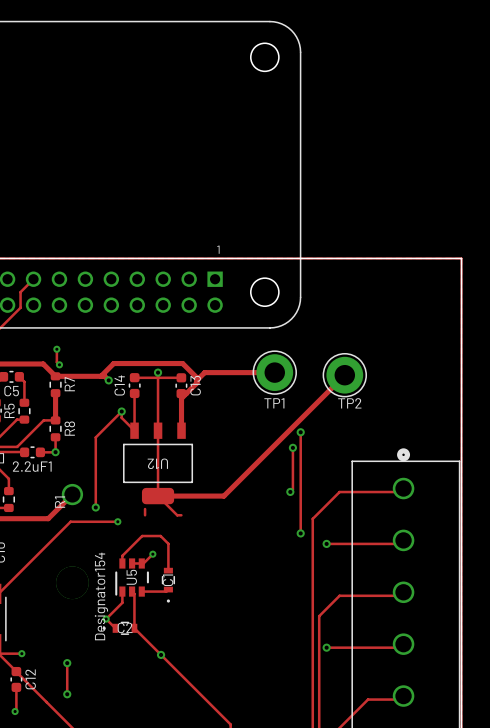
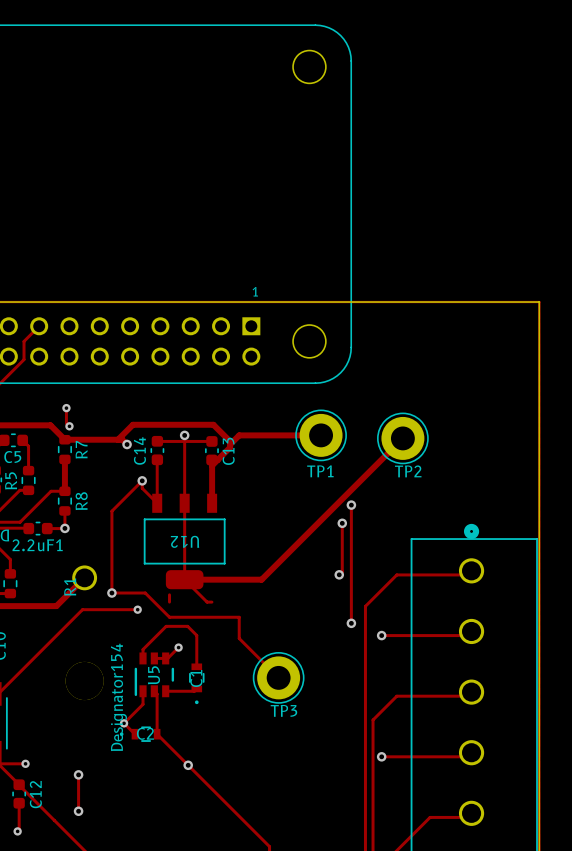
track: none -> (111, 593) (145, 593) (169, 617) (239, 617) (239, 638) (278, 677)
TP3: none -> (278, 677)

